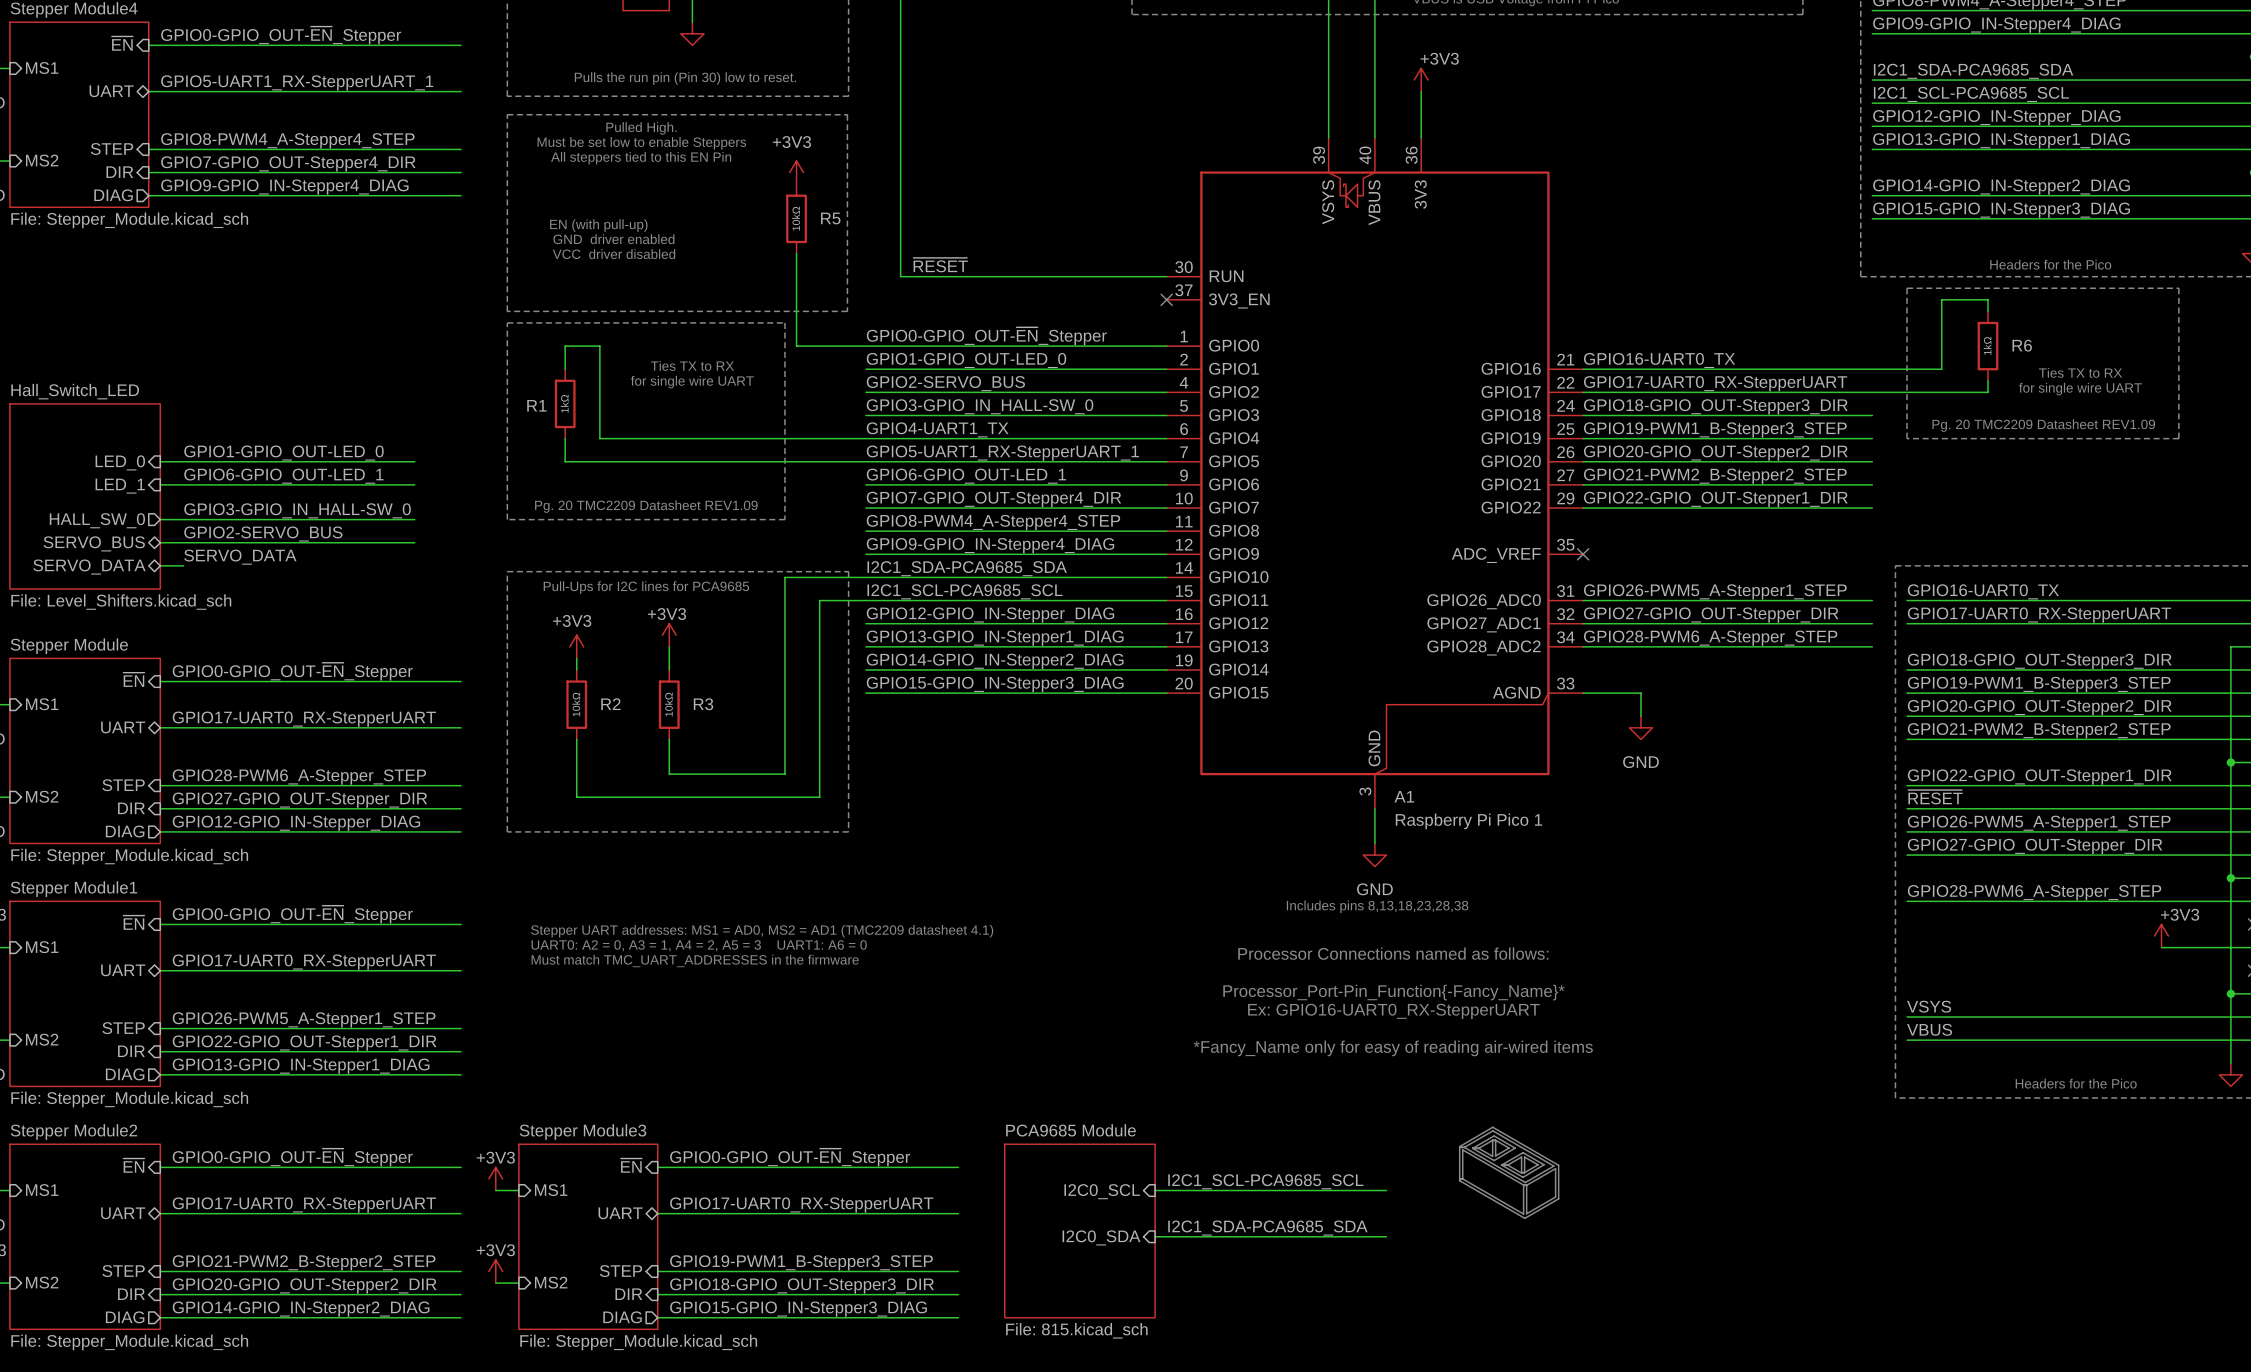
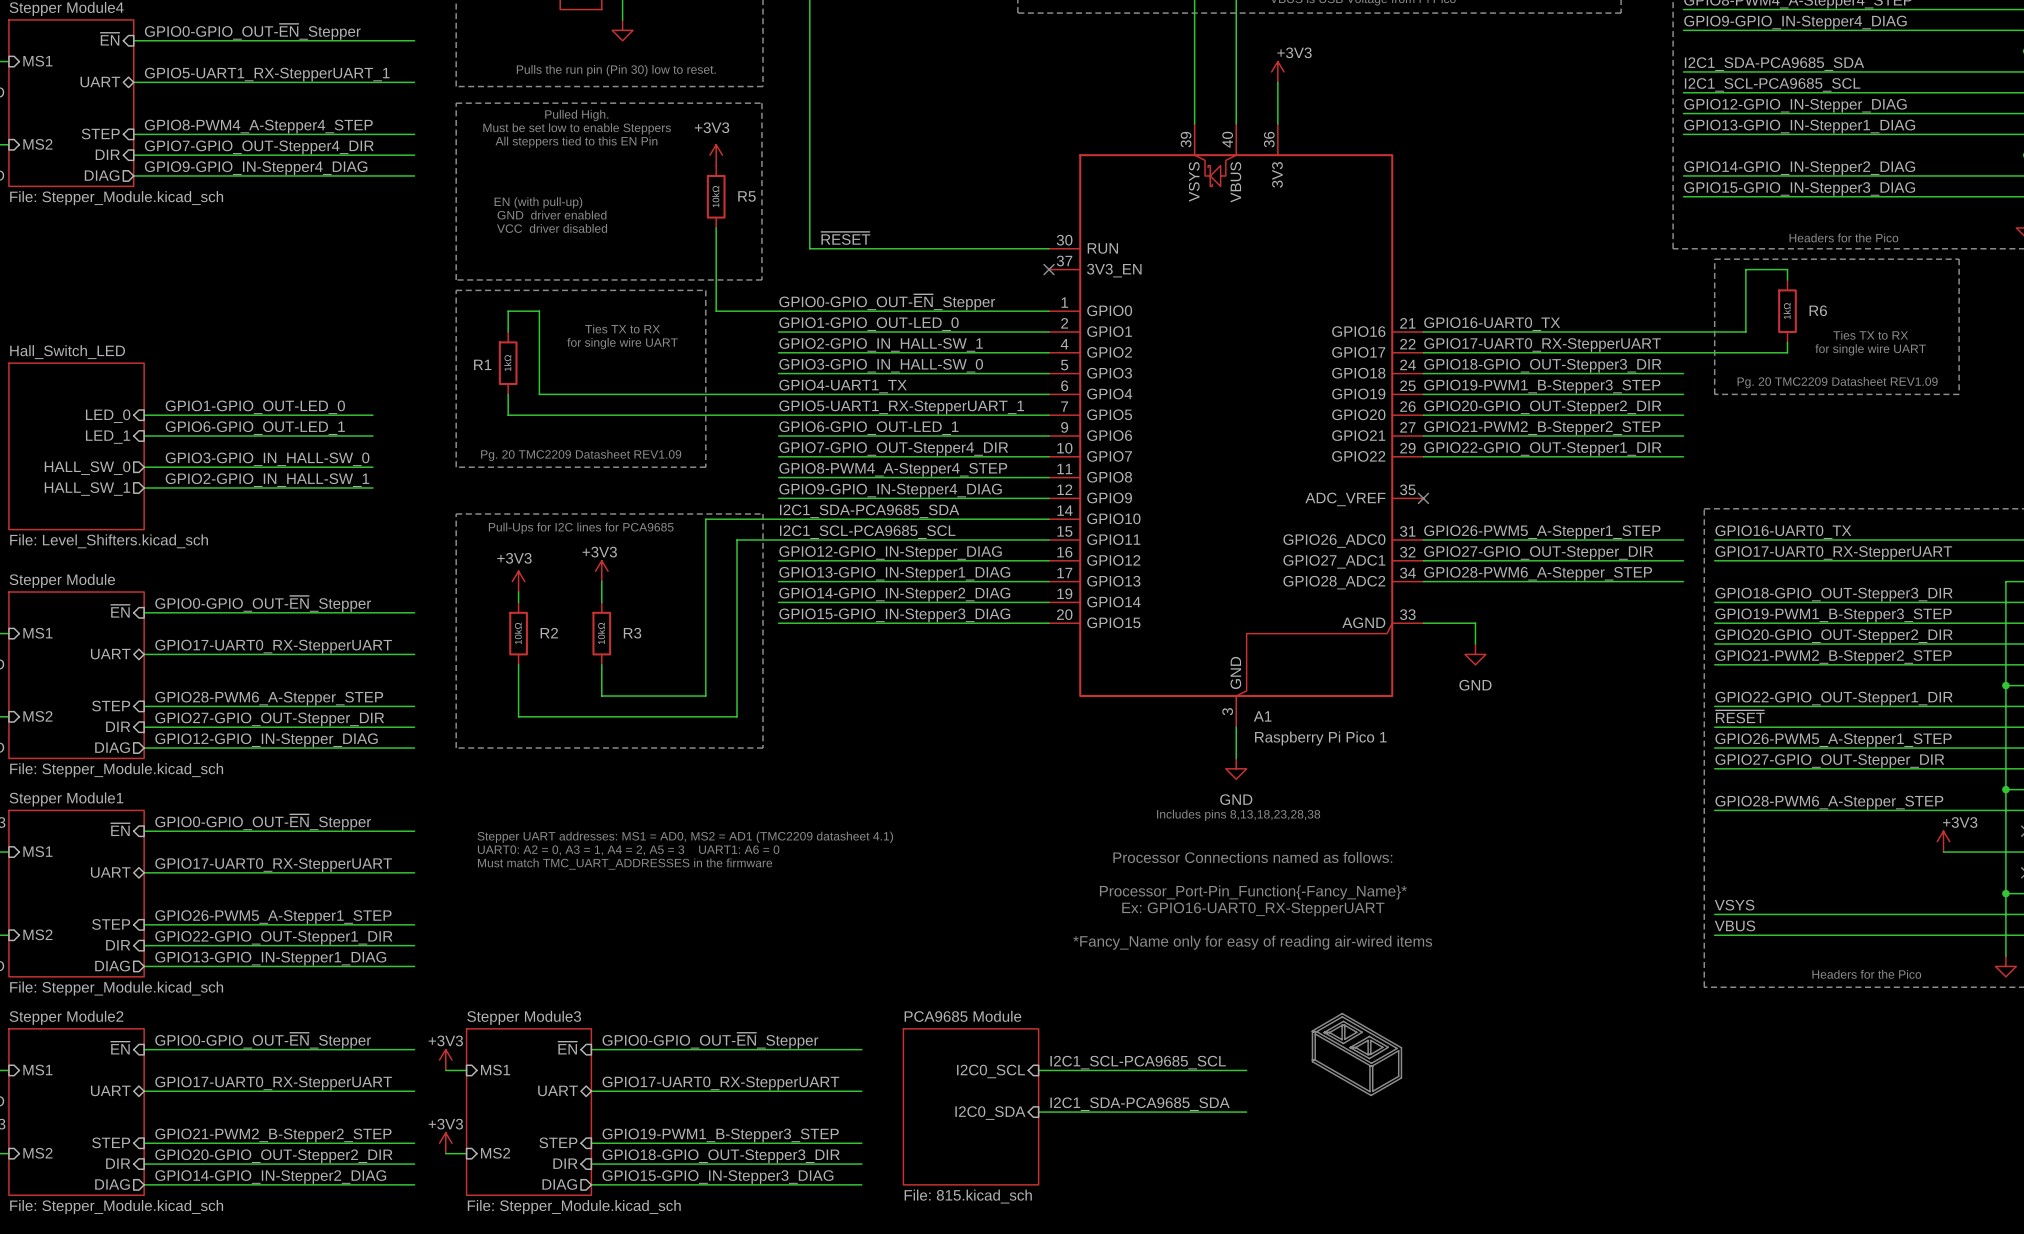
label: GPIO2-SERVO_BUS (945, 383) -> GPIO2-GPIO_IN_HALL-SW_1 (881, 344)
label: GPIO2-SERVO_BUS (263, 534) -> GPIO2-GPIO_IN_HALL-SW_1 (267, 480)
sheet pin shape: bidirectional (94, 543) -> output (87, 489)
sheet pin: SERVO_BUS (94, 543) -> HALL_SW_1 (87, 489)
label: SERVO_DATA (240, 557) -> none
wire: (160, 565) (183, 565) -> none
sheet pin: SERVO_DATA (89, 567) -> none

